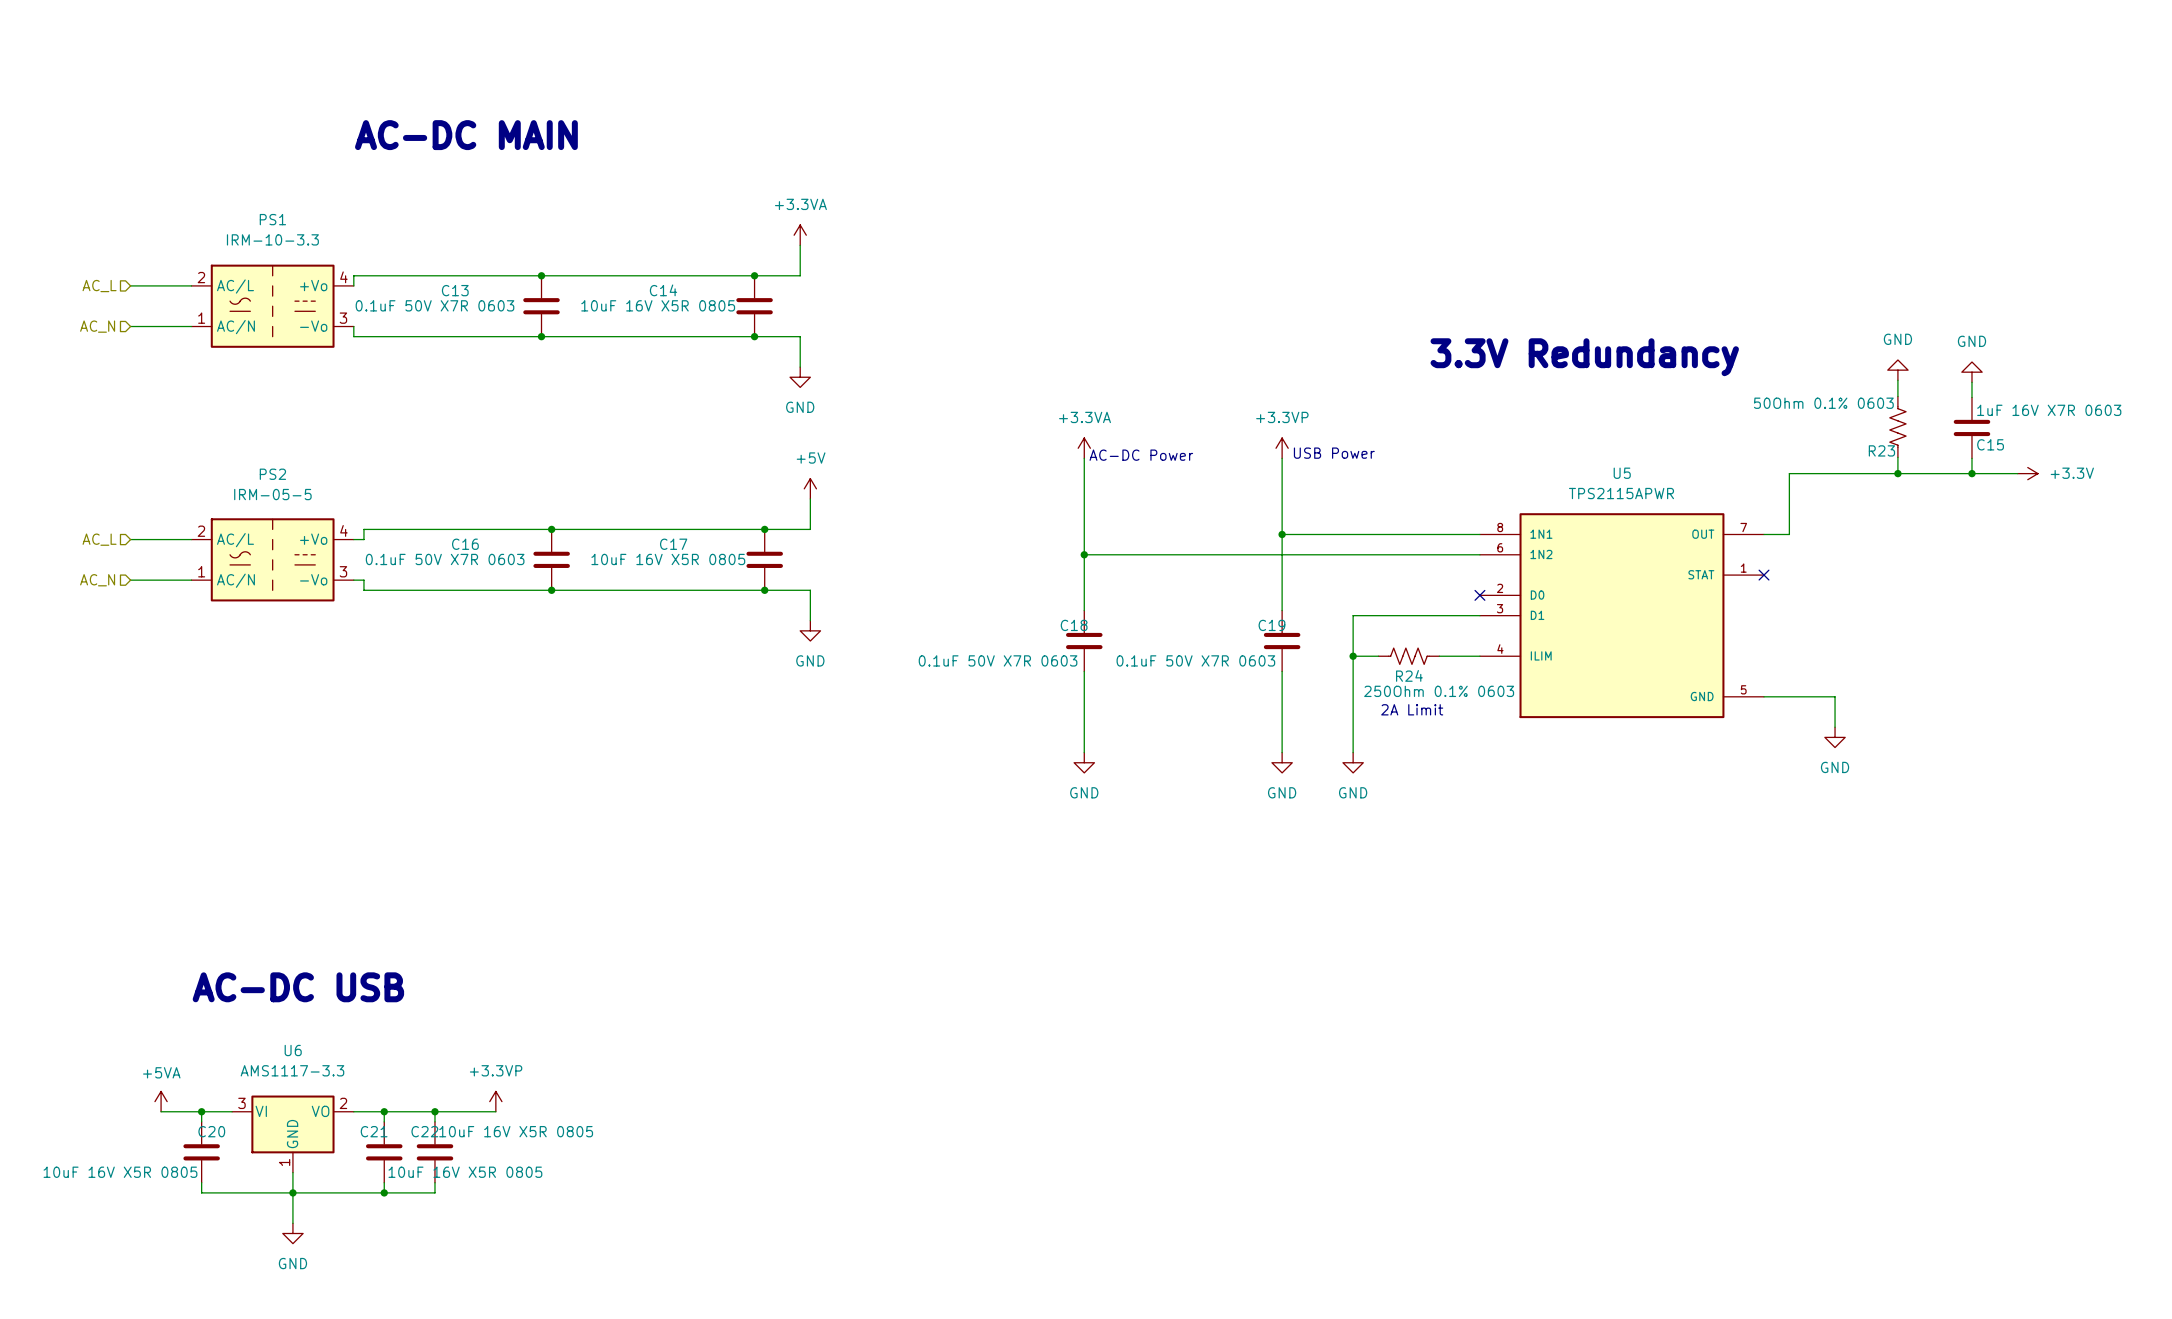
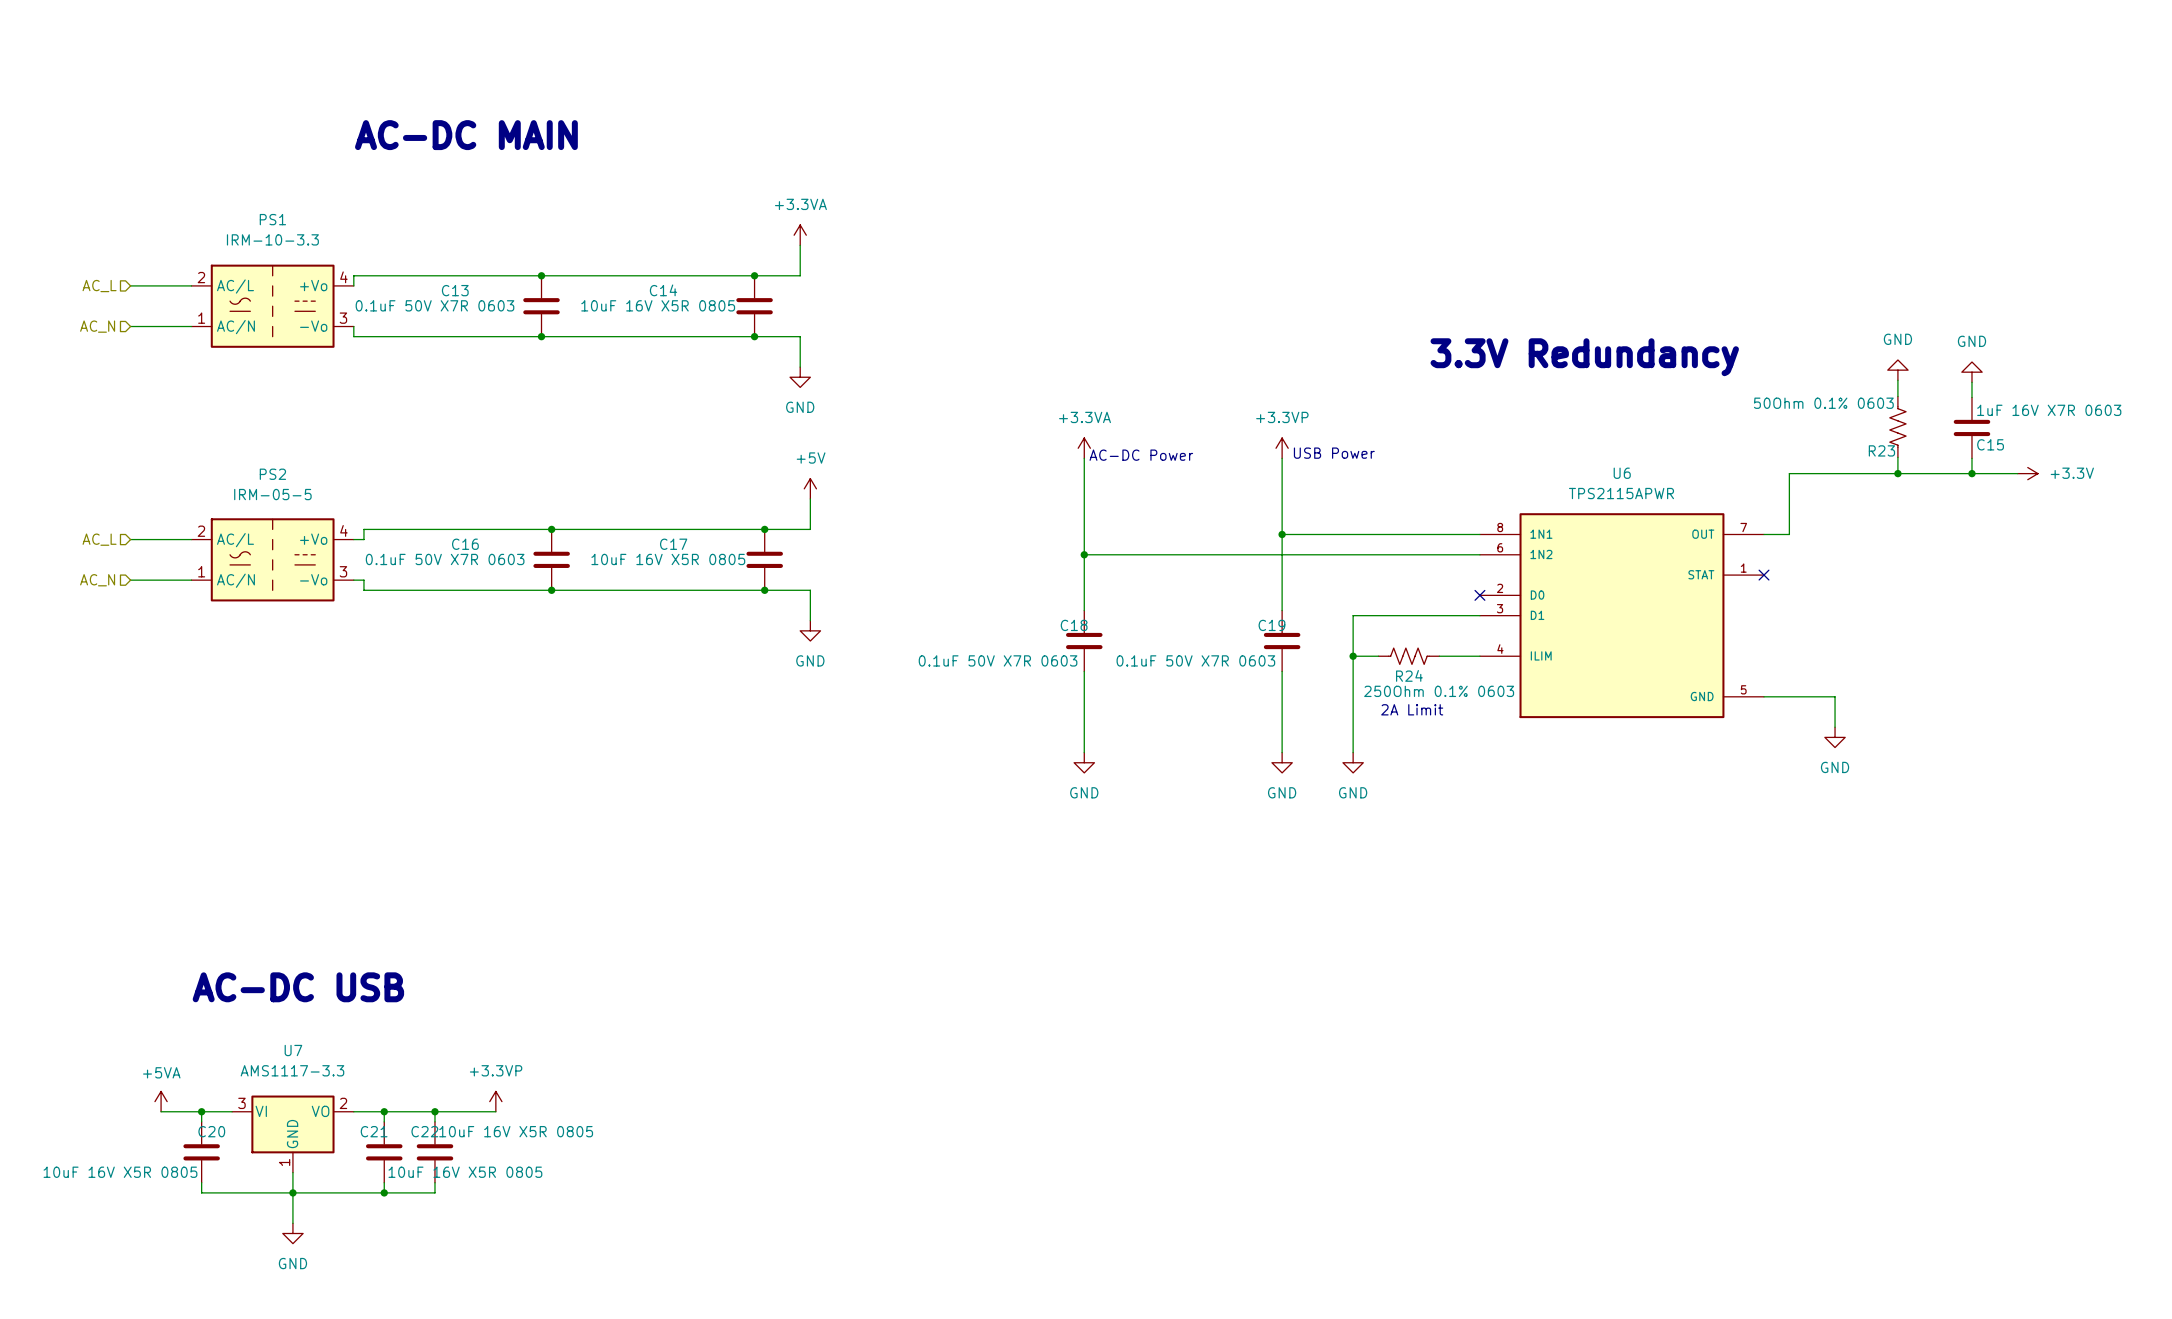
U5 name: U5 (1622, 473) -> U6 (1622, 473)
U6 name: U6 (293, 1050) -> U7 (293, 1050)

